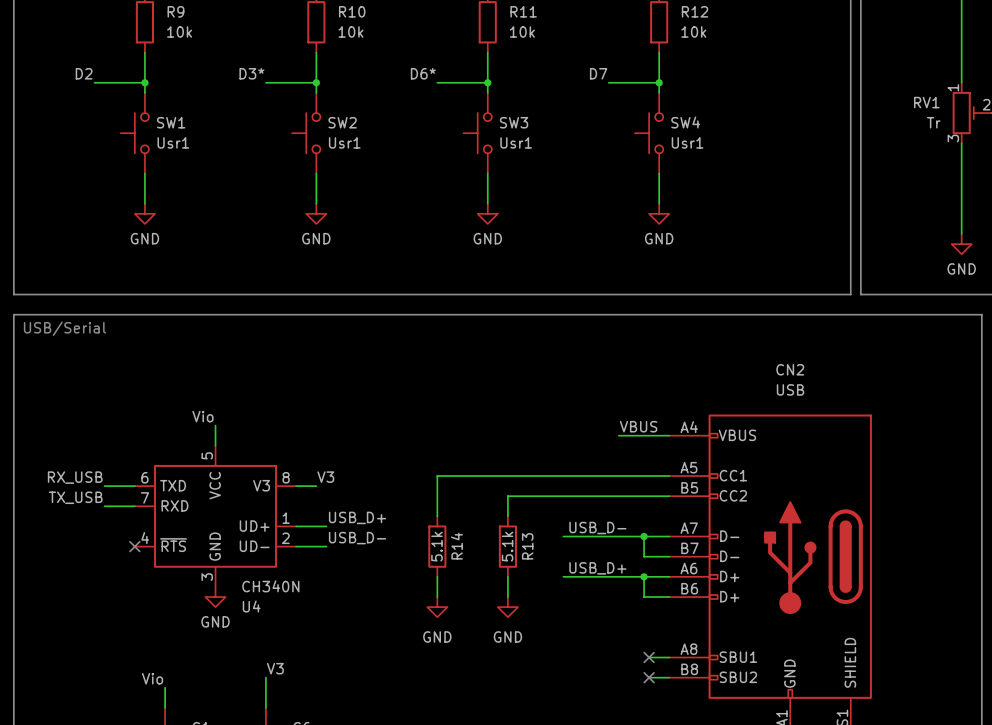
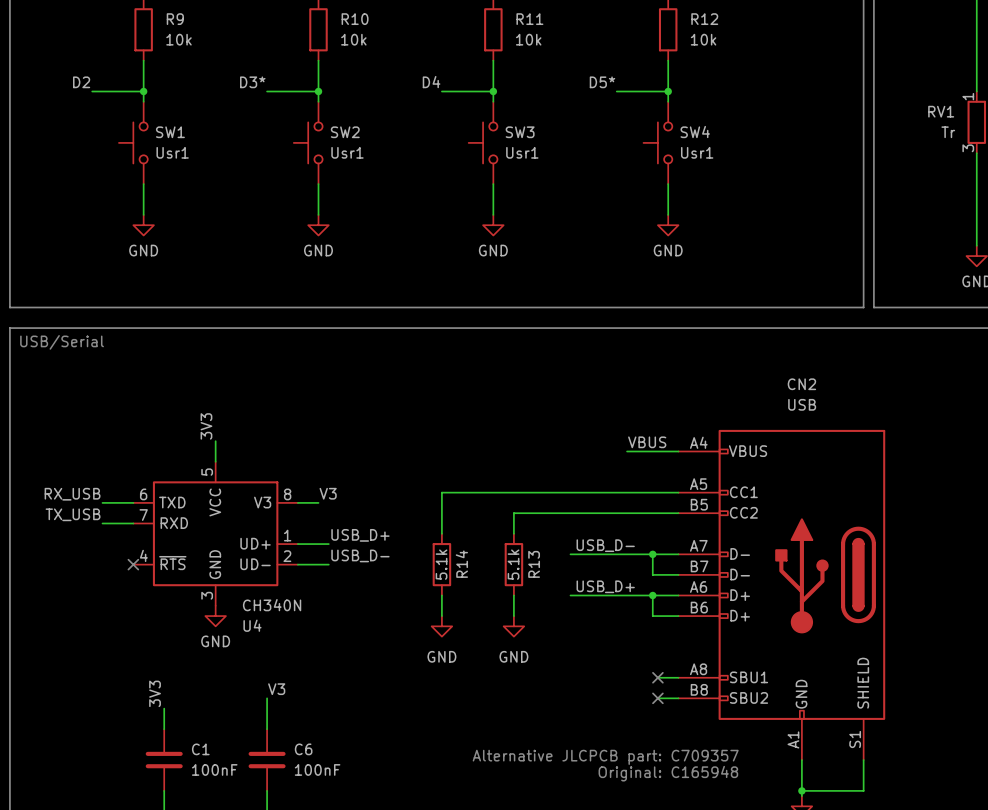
label: D6* (423, 73) -> D4 (431, 82)
label: D7 (598, 73) -> D5* (602, 82)
label: Vio (202, 416) -> 3V3 (206, 426)
label: Vio (152, 678) -> 3V3 (155, 693)

